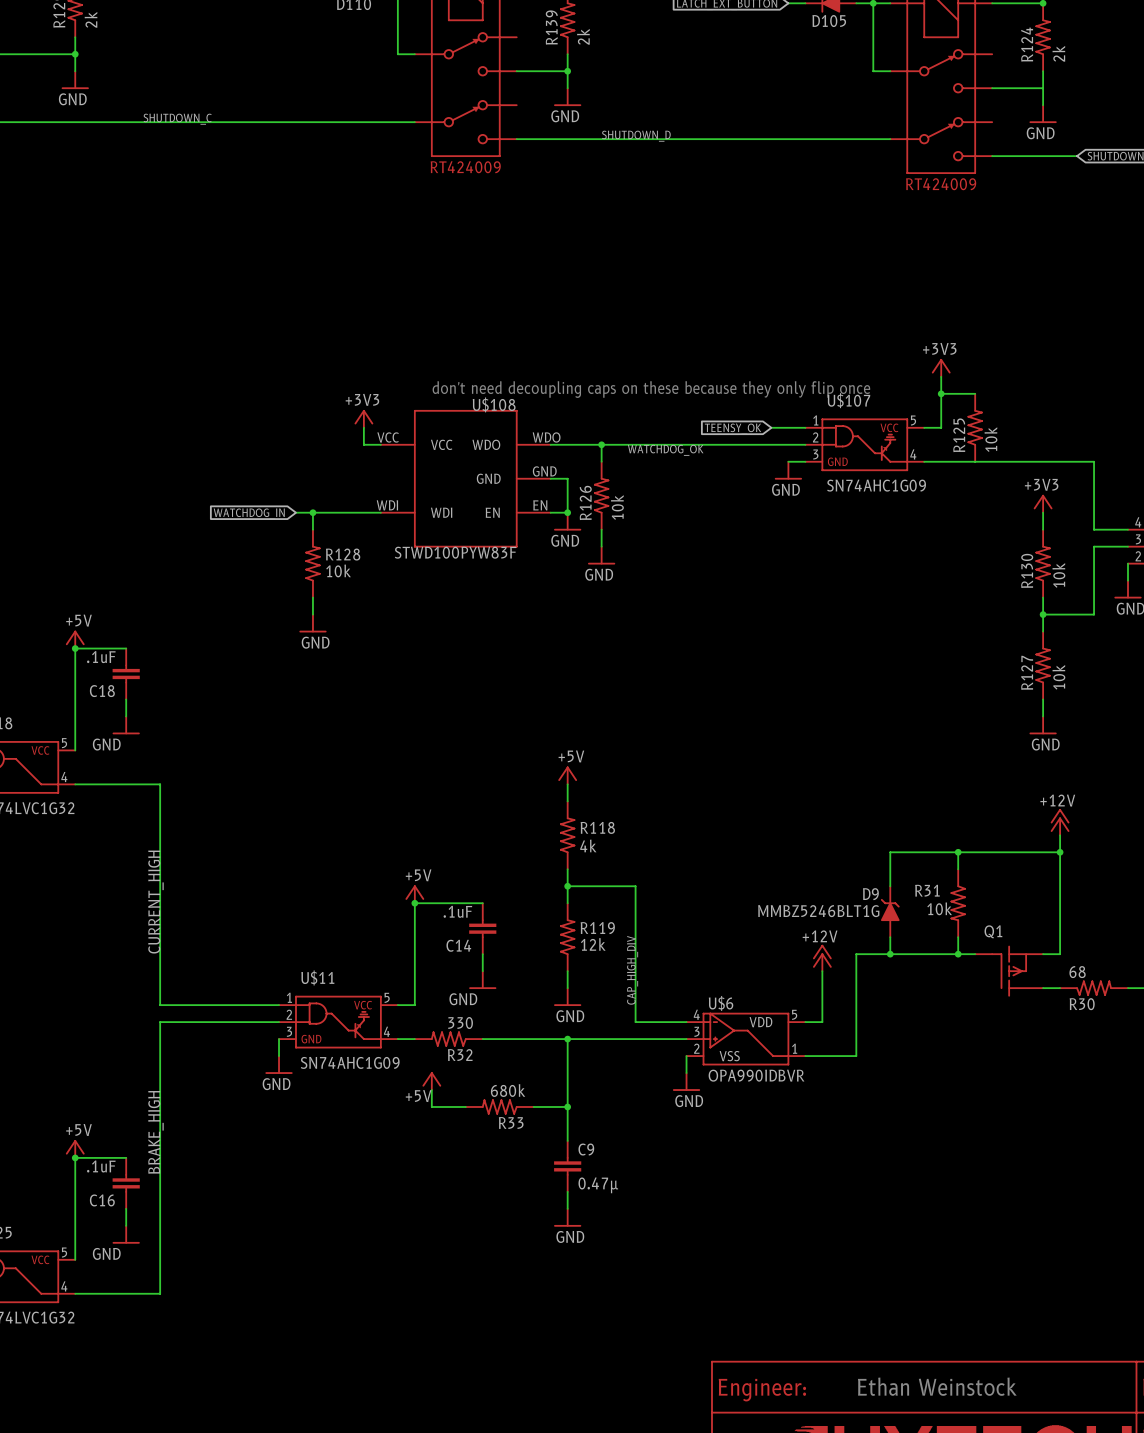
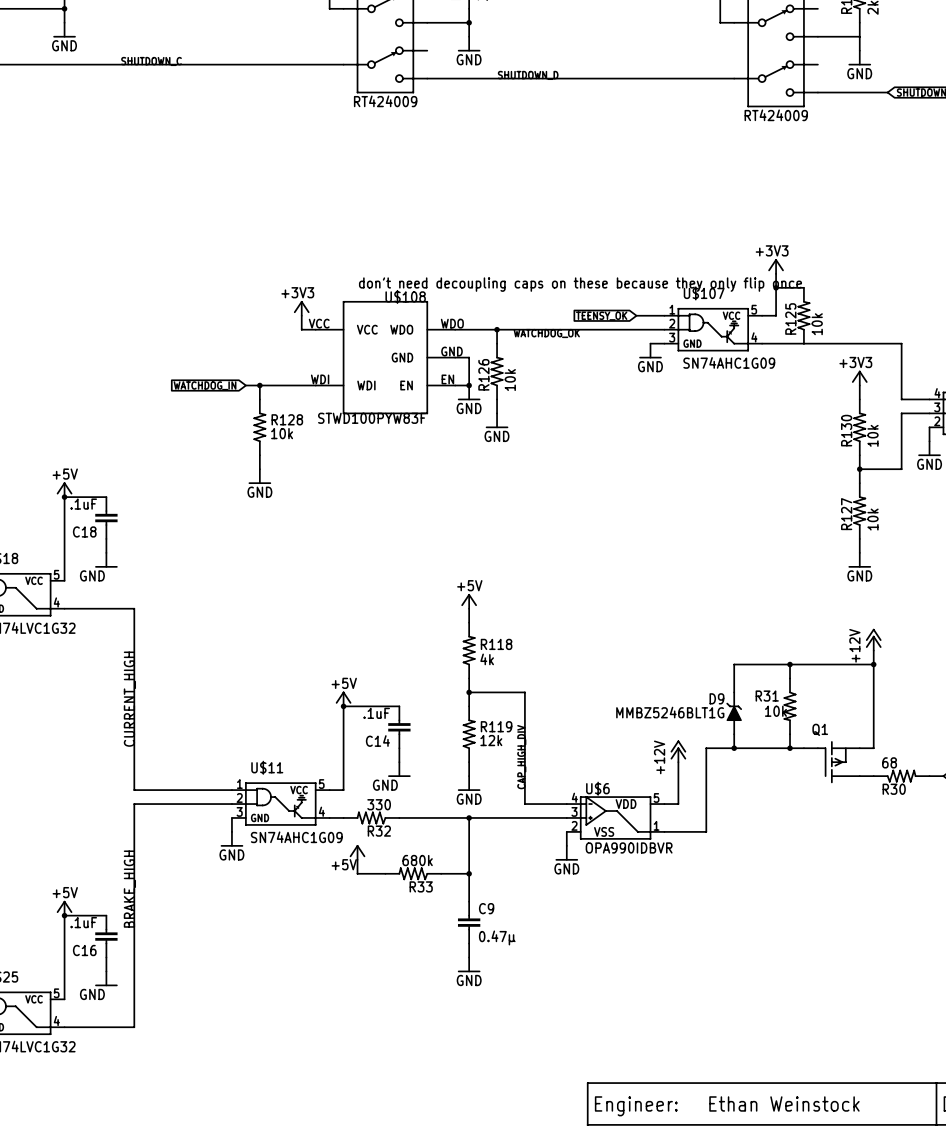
power symbol text rotation: 0° (1057, 800) -> 90° counterclockwise (854, 645)
power symbol text rotation: 0° (820, 936) -> 90° counterclockwise (659, 757)

